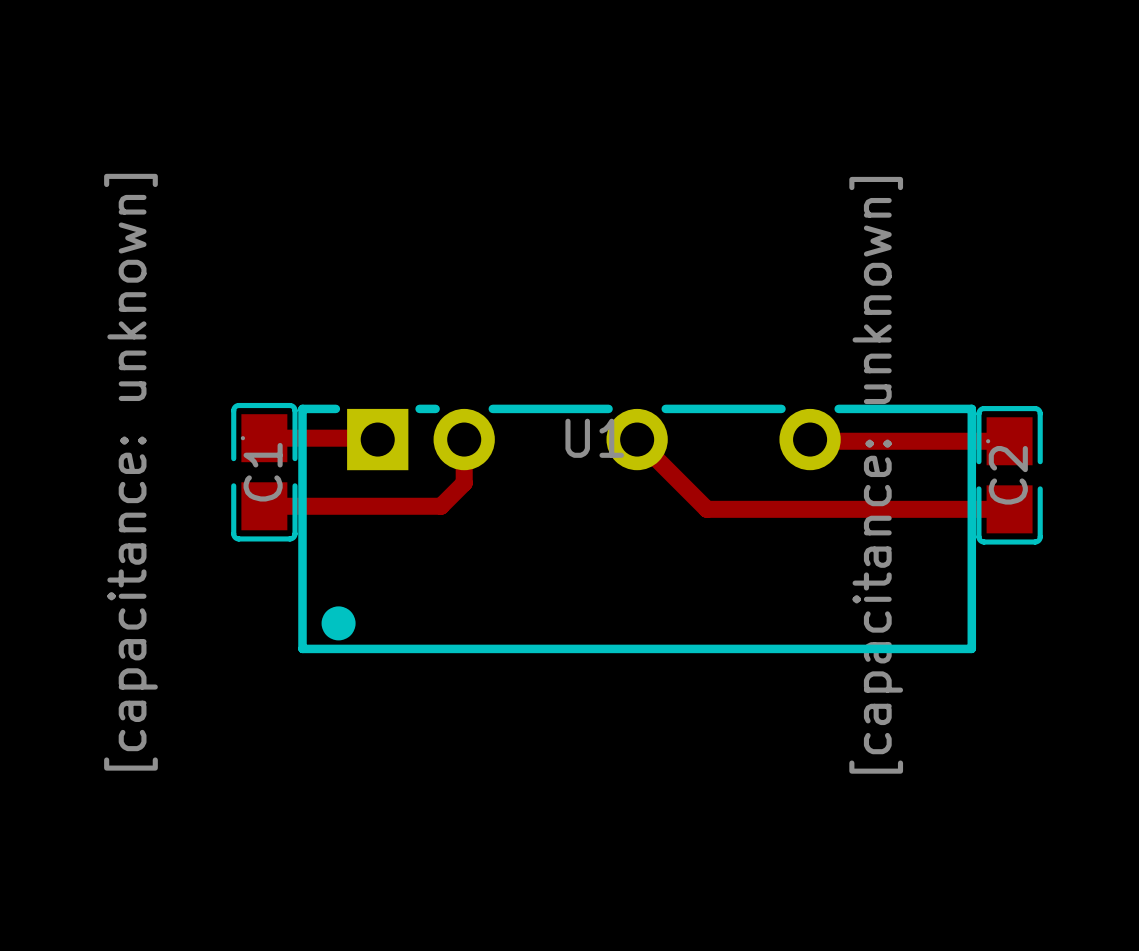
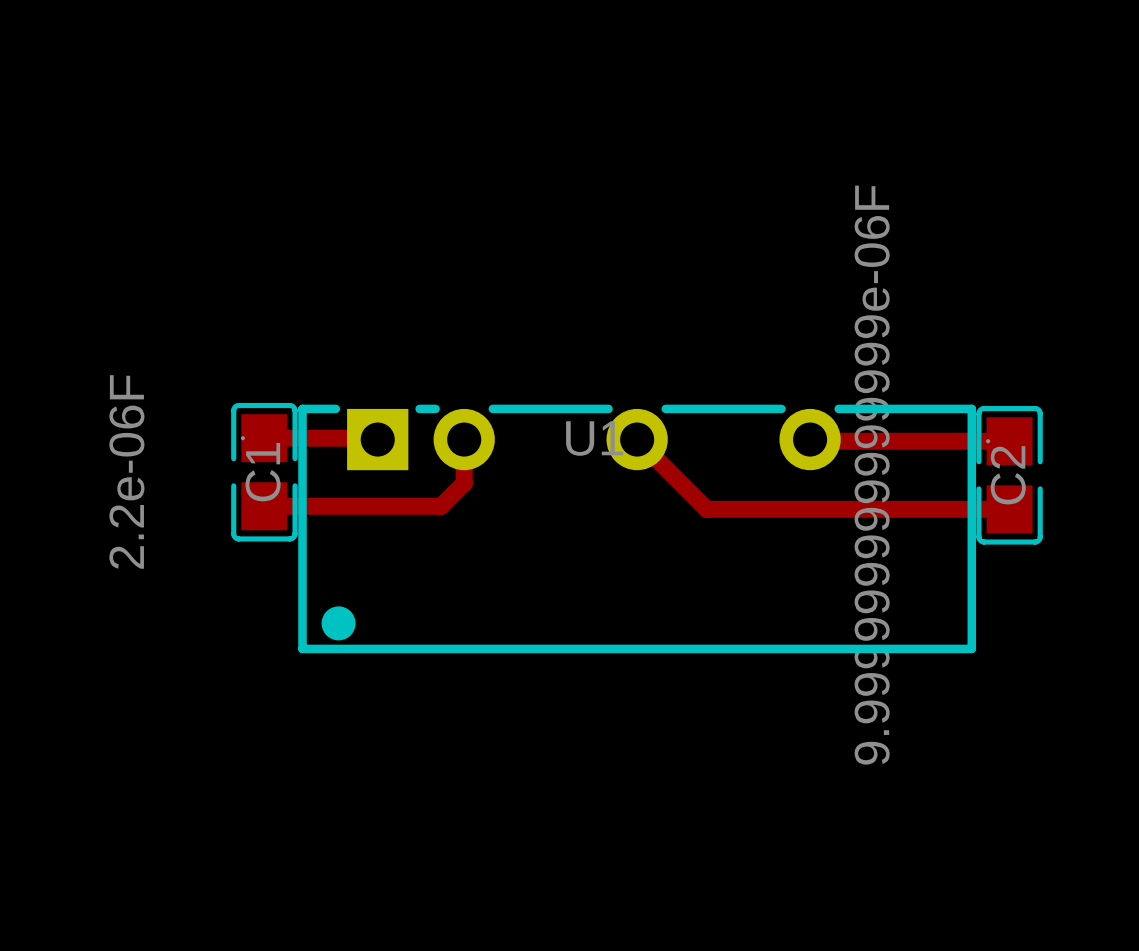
C1 value: [capacitance: unknown] (130, 472) -> 2.2e-06F (126, 471)
C2 value: [capacitance: unknown] (876, 475) -> 9.999999999999999e-06F (872, 475)

